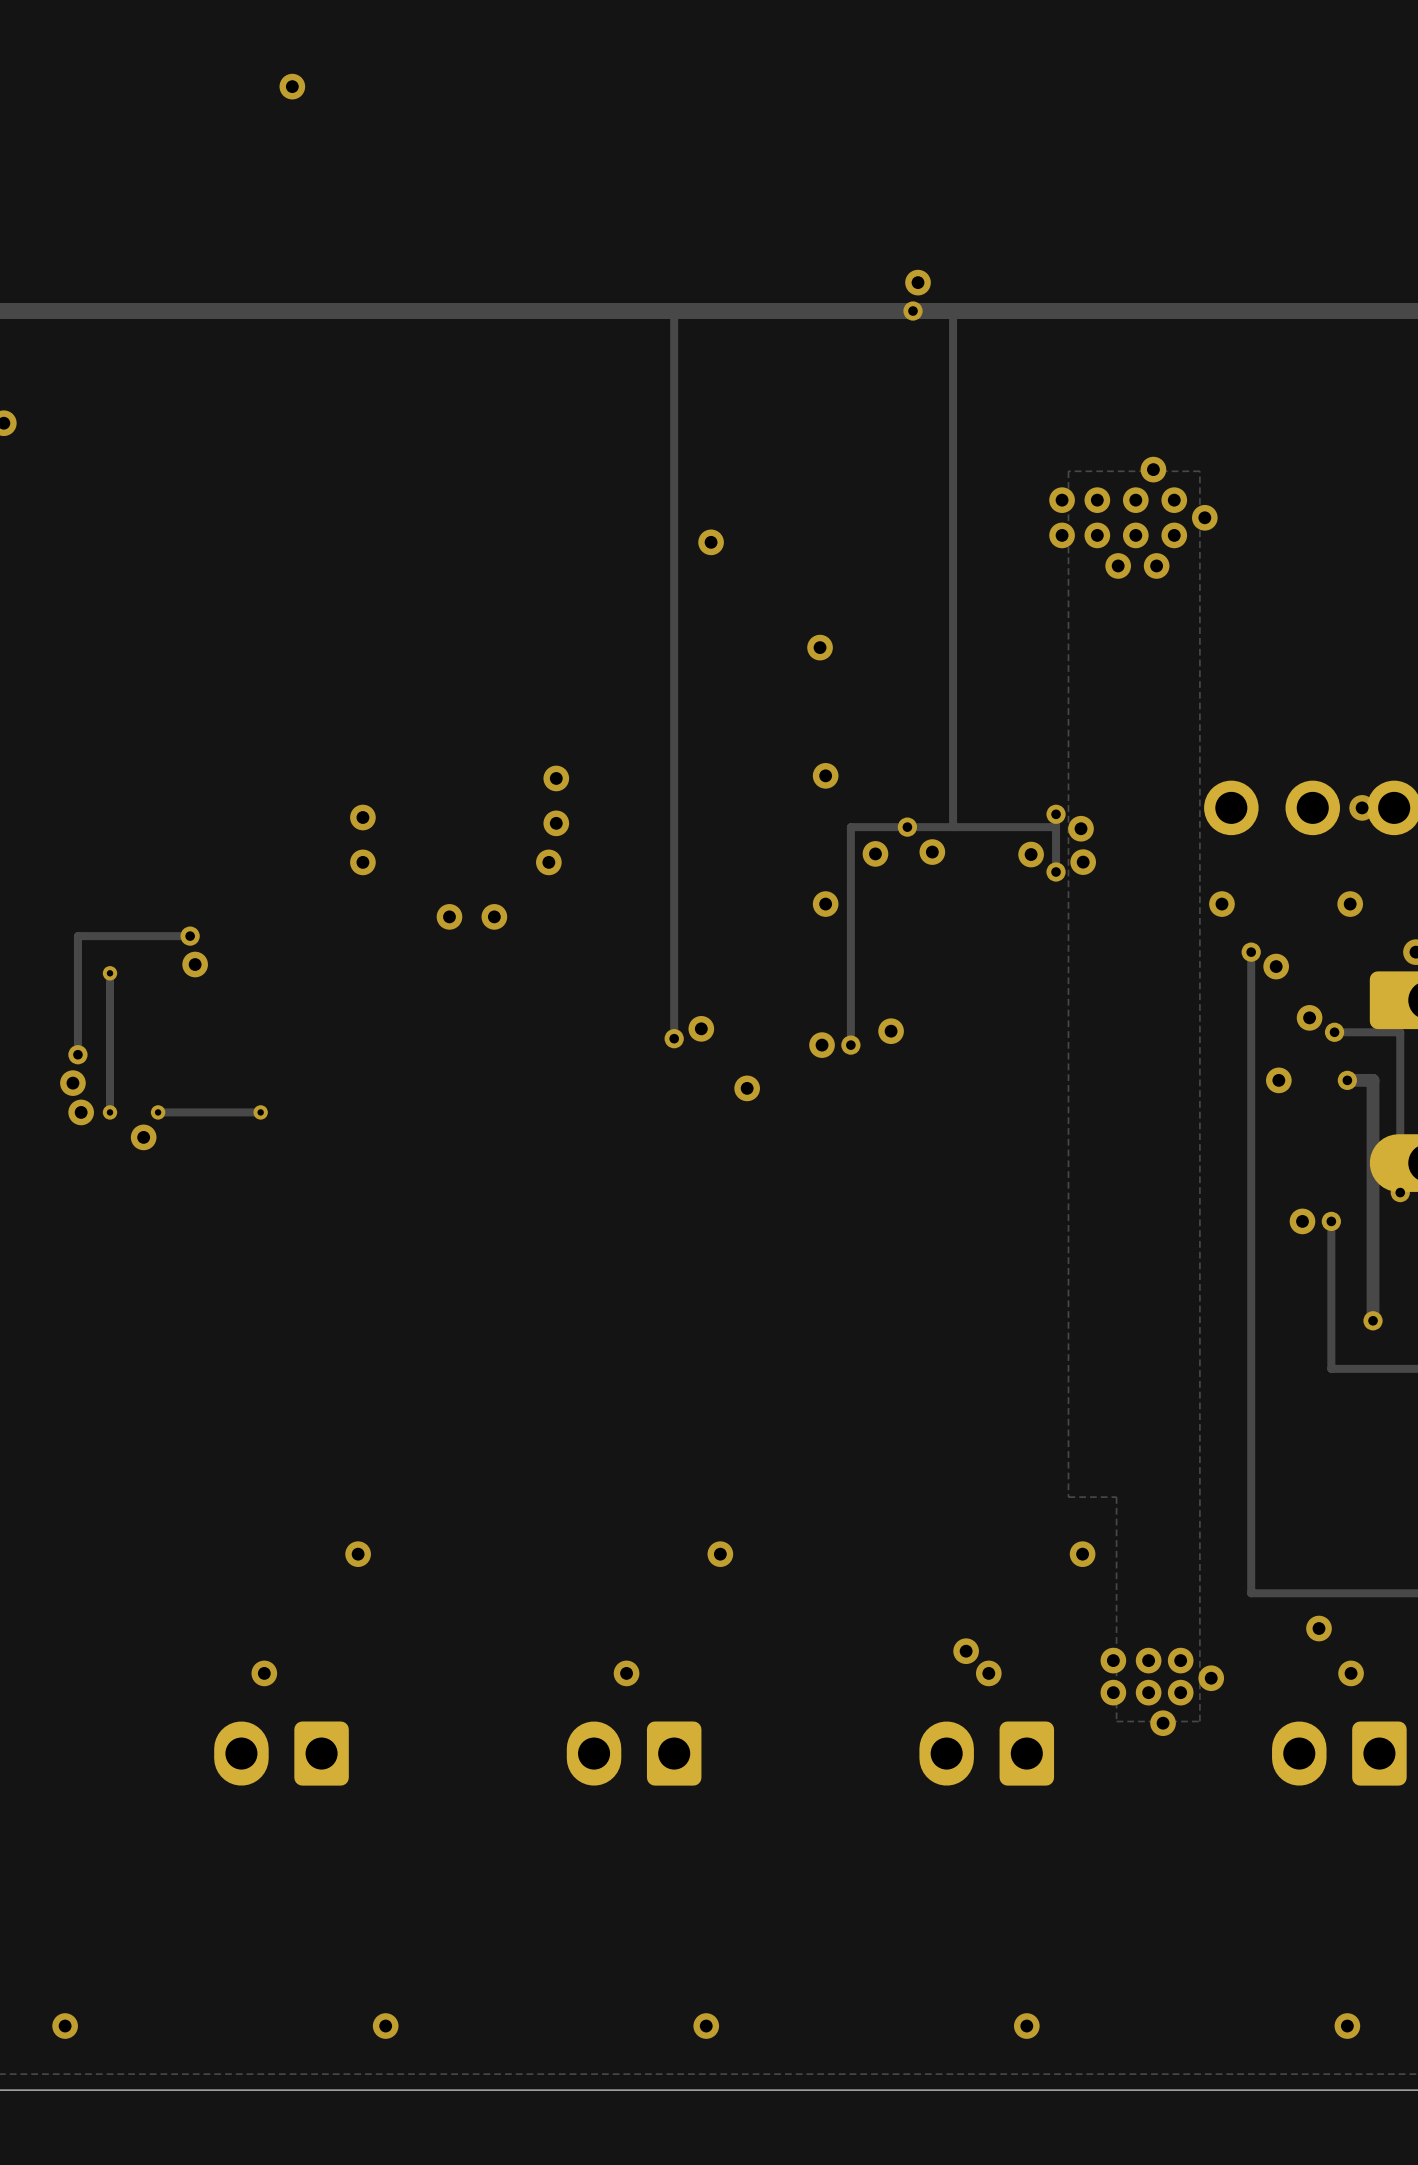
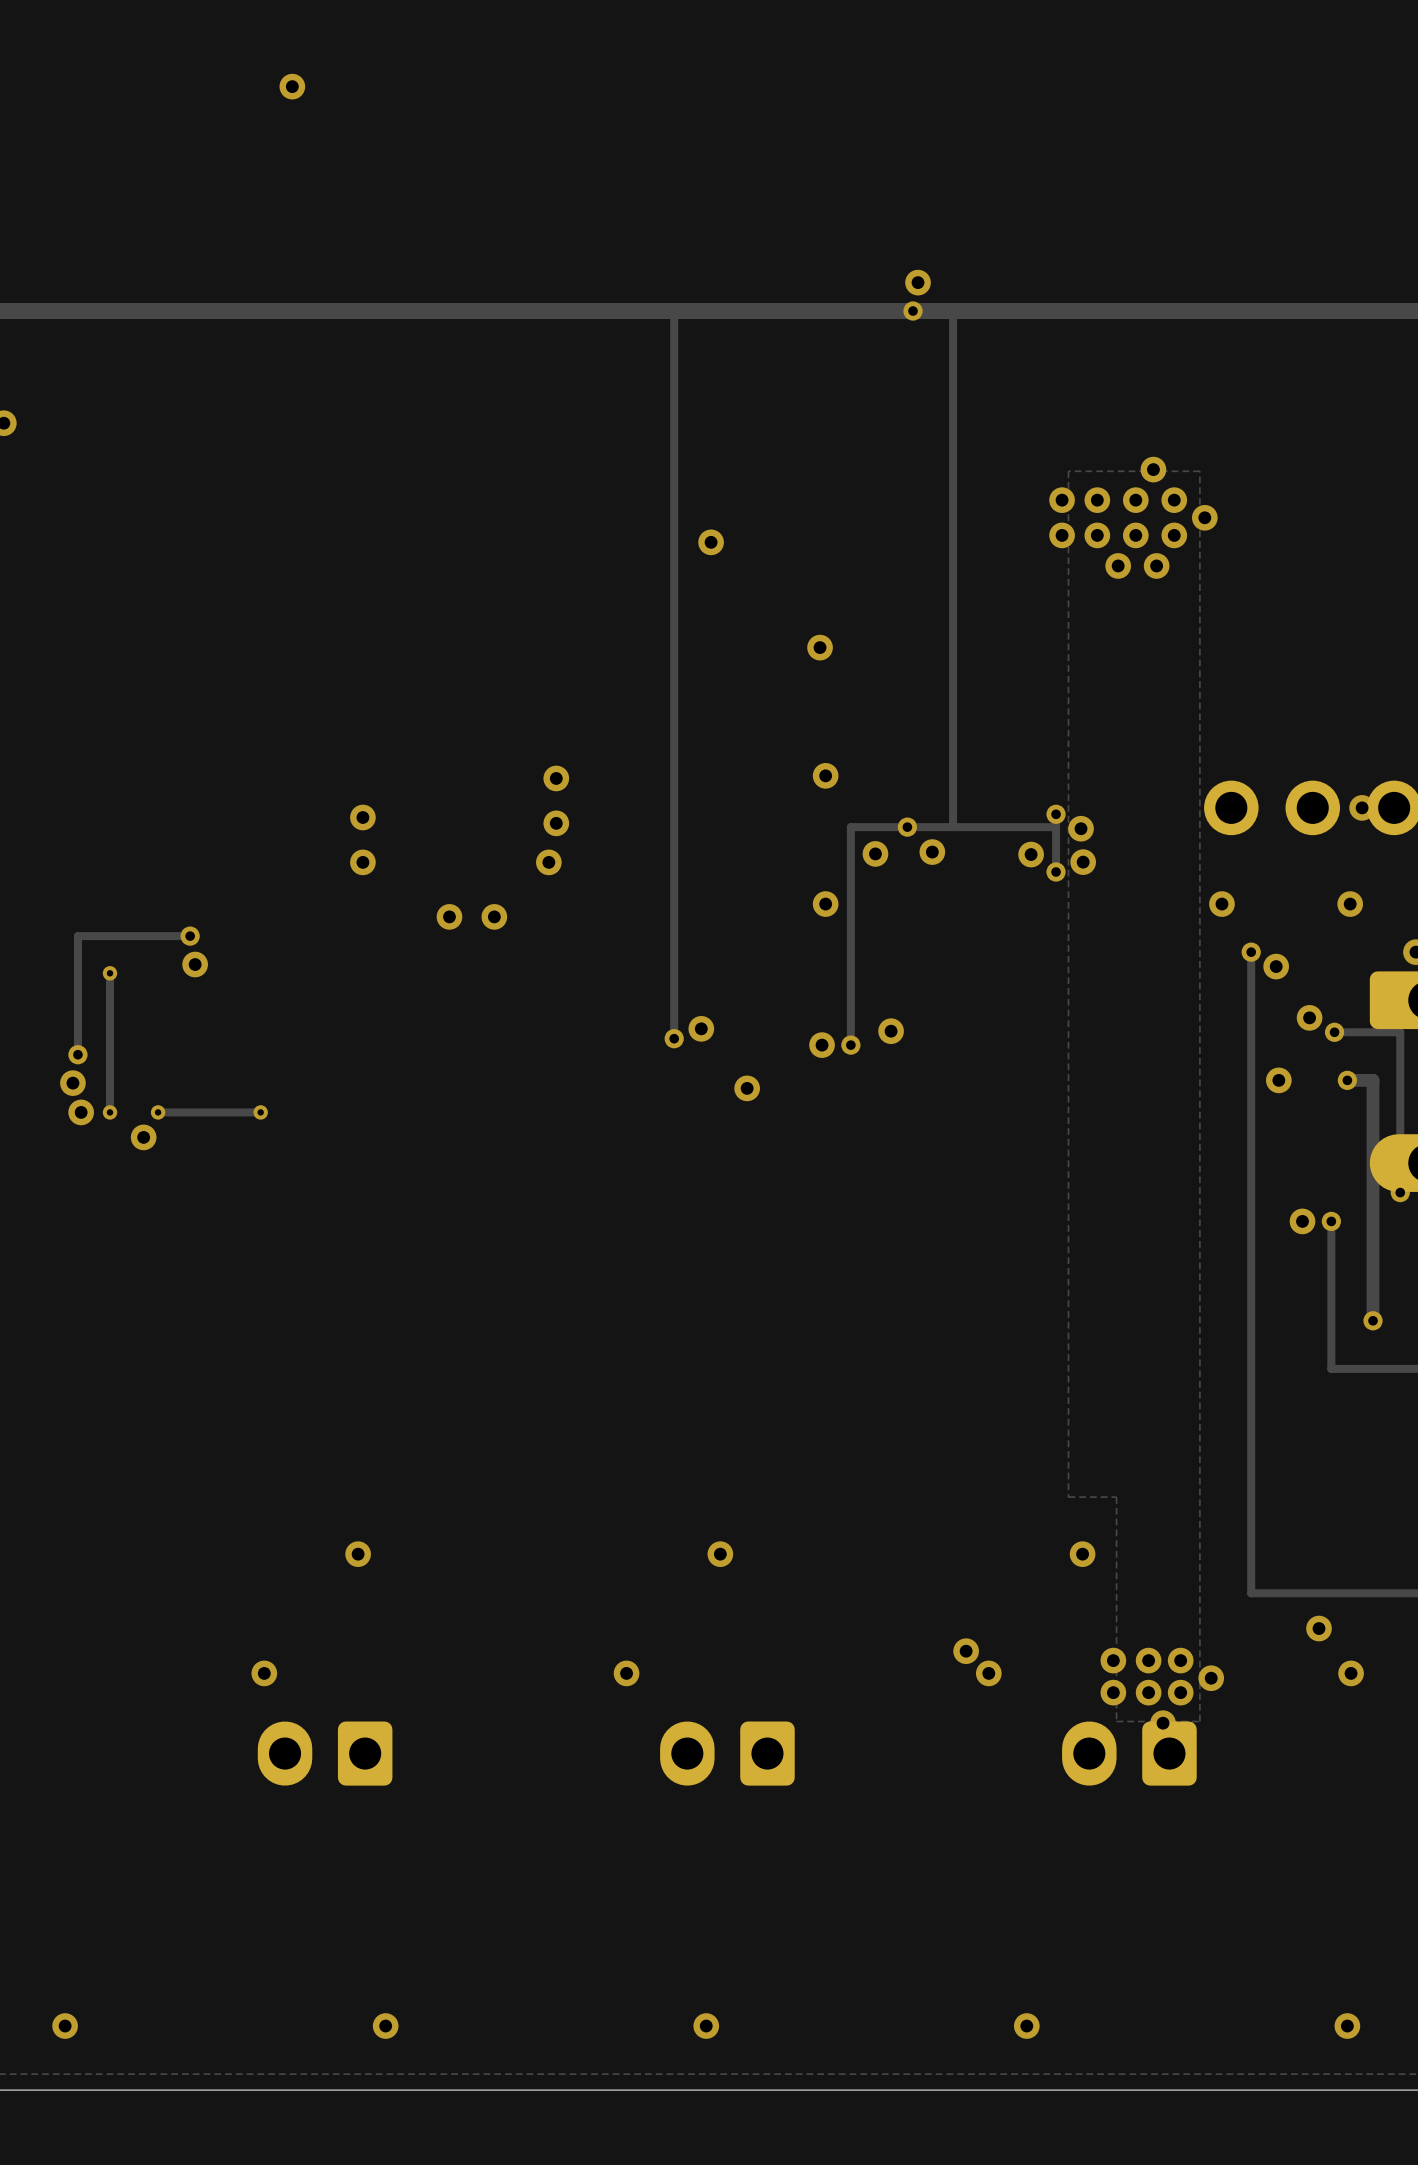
part position: (281, 1753) -> (325, 1753)
part position: (634, 1753) -> (727, 1753)
part: (986, 1753) -> none
part: none -> (1129, 1753)
part: (1339, 1753) -> none

